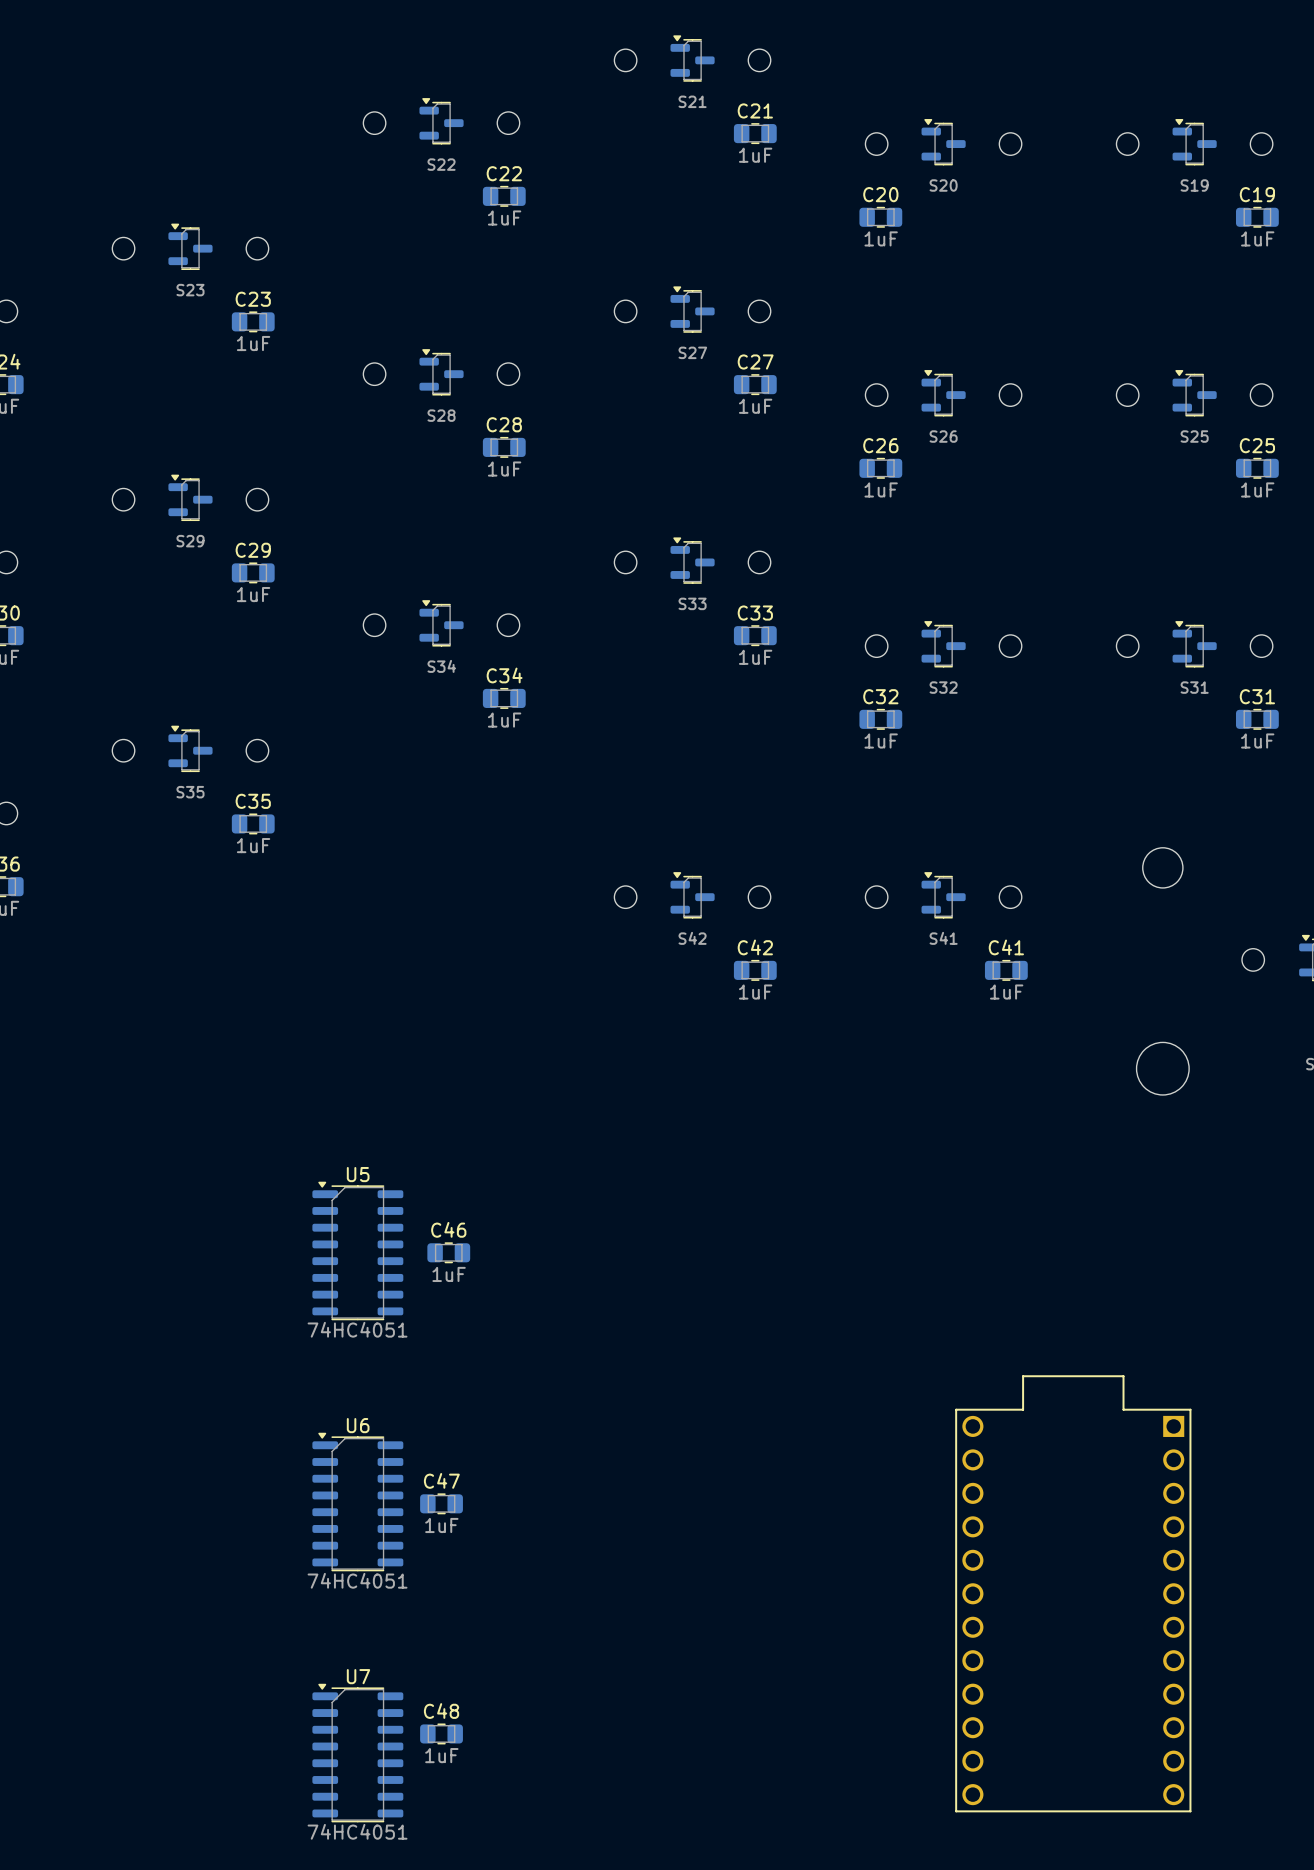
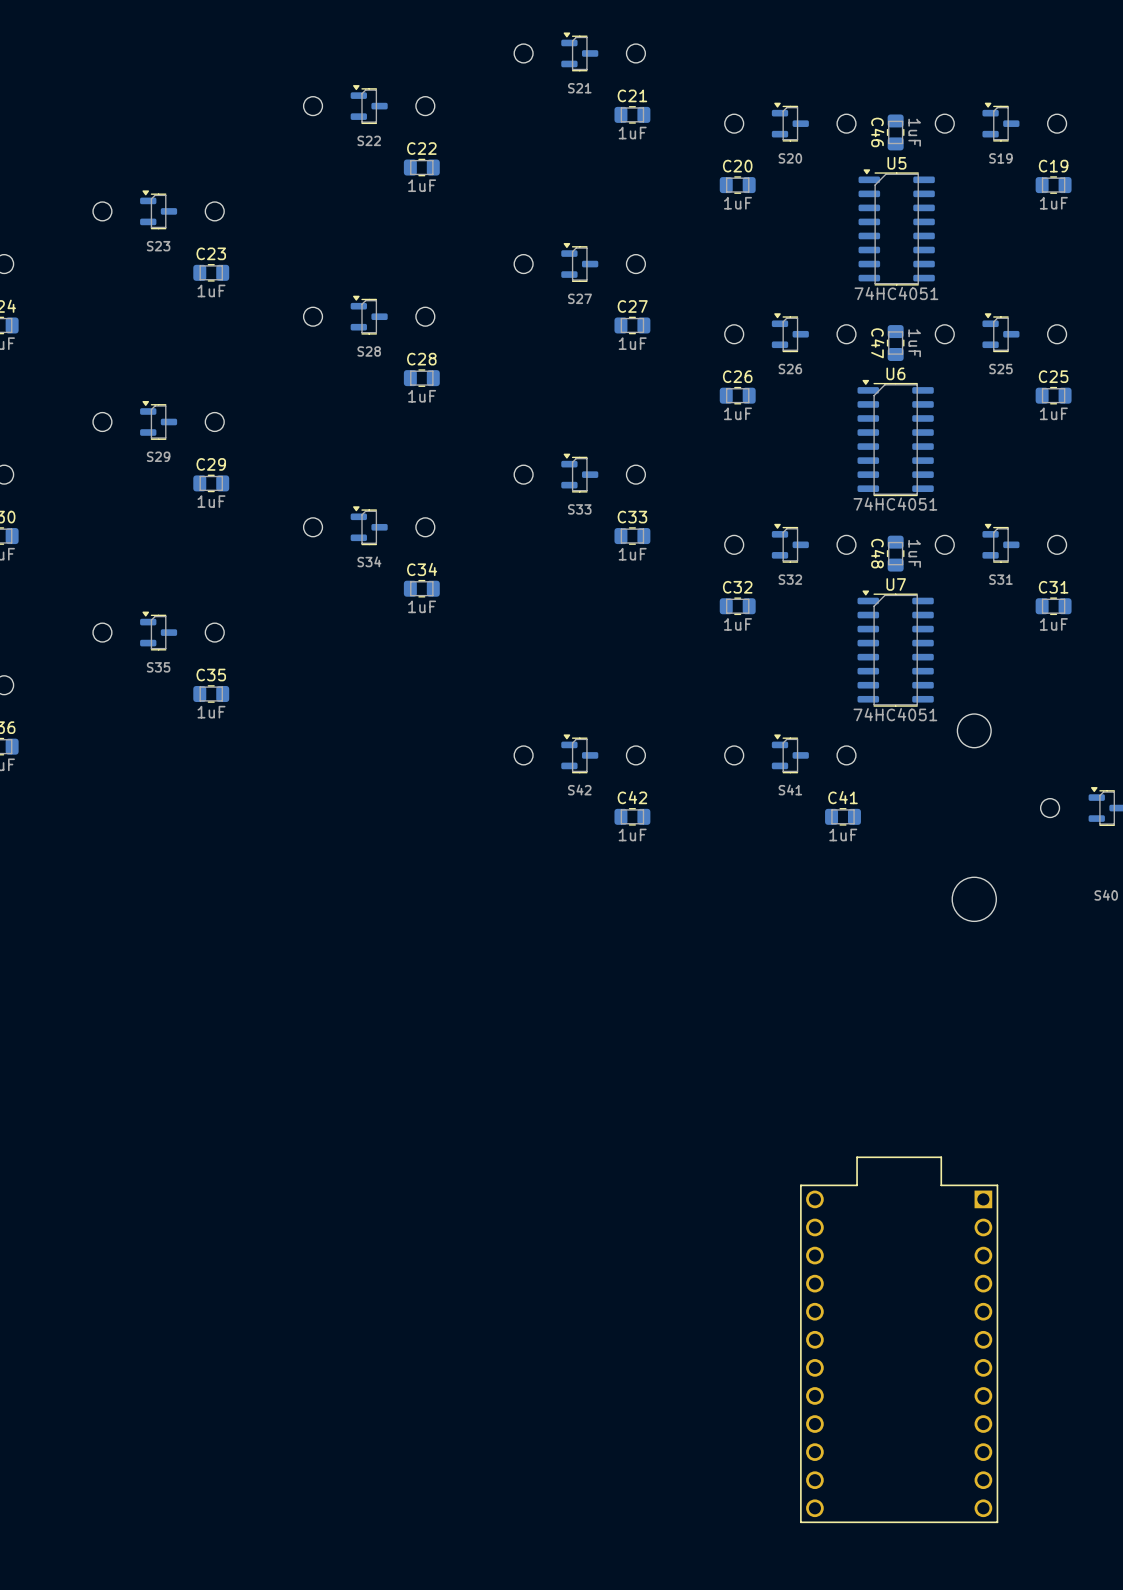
C46 name position: C46 (448, 1229) -> C46 (877, 132)
U5 position: (357, 1250) -> (896, 227)
C46 rotation: 0° (448, 1252) -> 90° clockwise (895, 132)
C46 position: (448, 1252) -> (895, 132)
C46 value position: 1uF (449, 1274) -> 1uF (914, 132)
C47 name position: C47 (441, 1480) -> C47 (877, 343)
U6 position: (357, 1502) -> (895, 438)
C47 rotation: 0° (441, 1503) -> 90° clockwise (895, 343)
C47 position: (441, 1503) -> (895, 343)
C47 value position: 1uF (441, 1525) -> 1uF (914, 343)
C48 name position: C48 (441, 1711) -> C48 (877, 553)
C48 rotation: 0° (441, 1733) -> 90° clockwise (895, 553)
C48 position: (441, 1733) -> (895, 553)
U7 position: (357, 1753) -> (895, 648)
C48 value position: 1uF (441, 1755) -> 1uF (914, 553)

